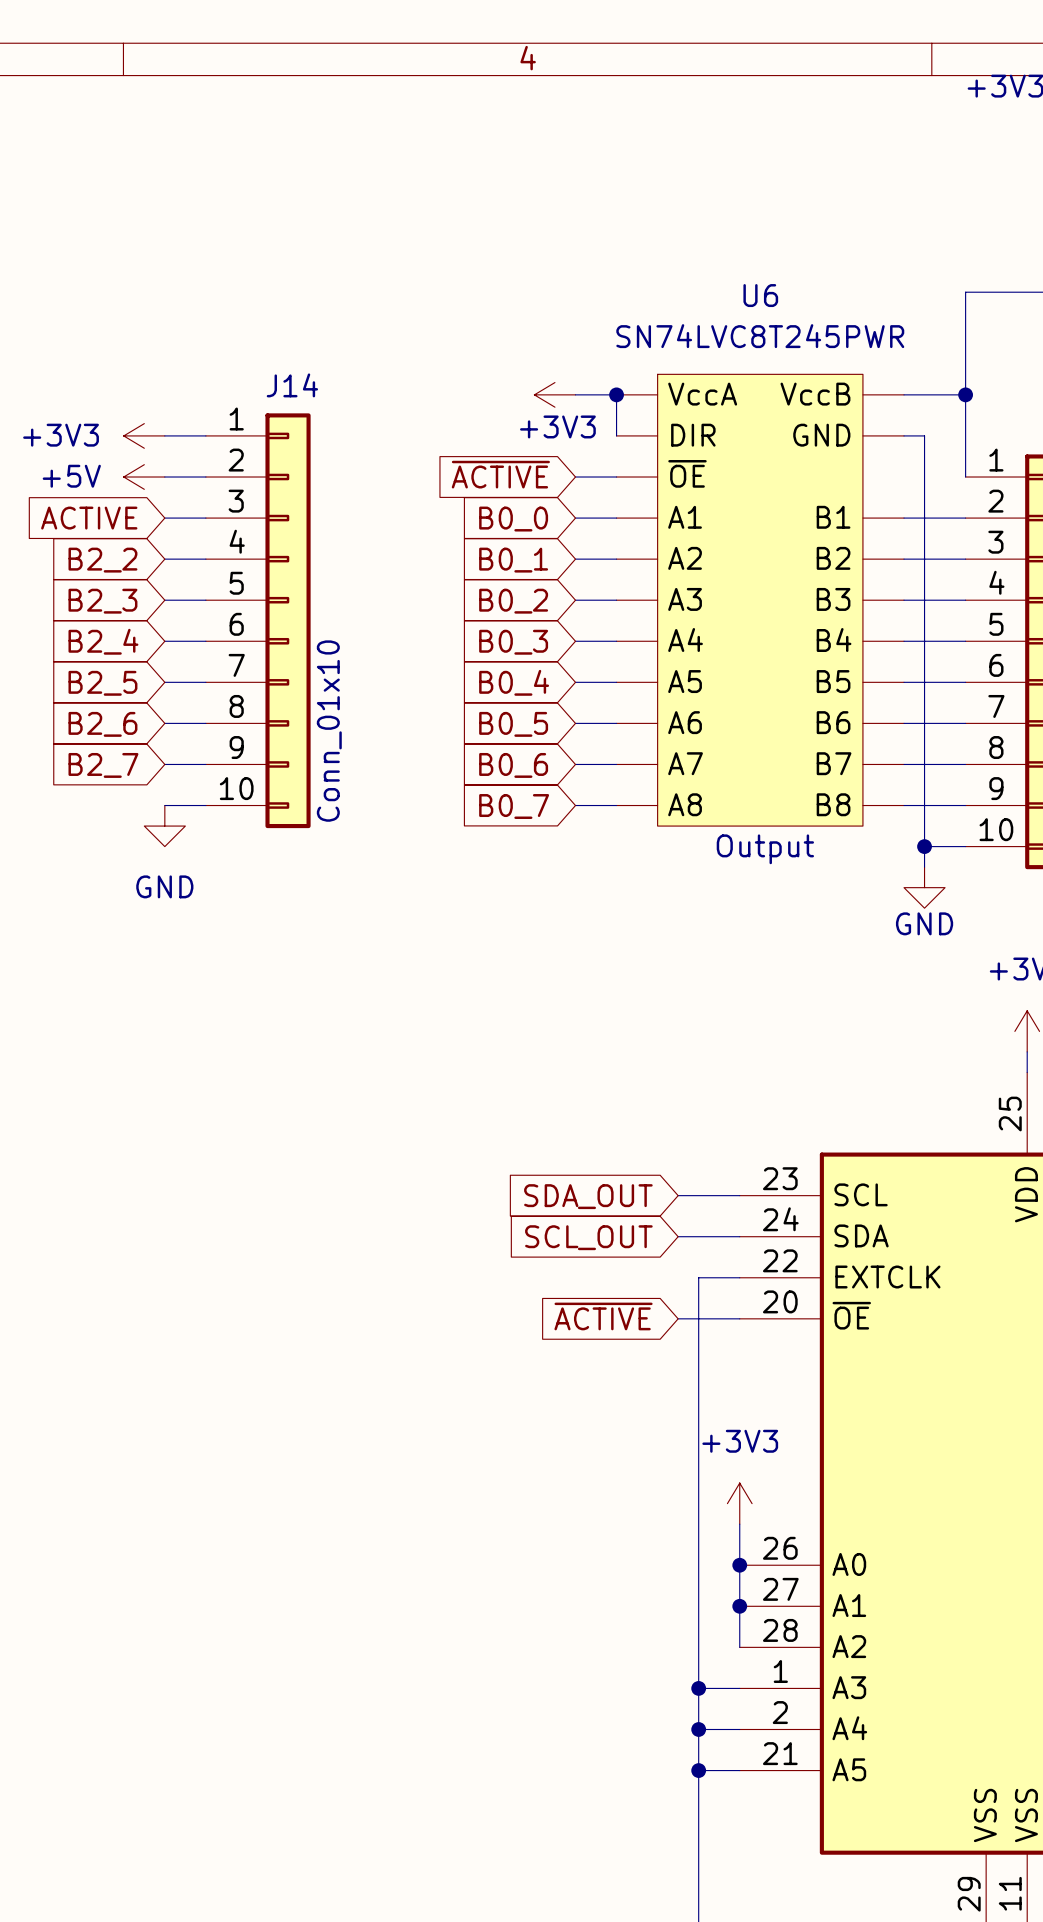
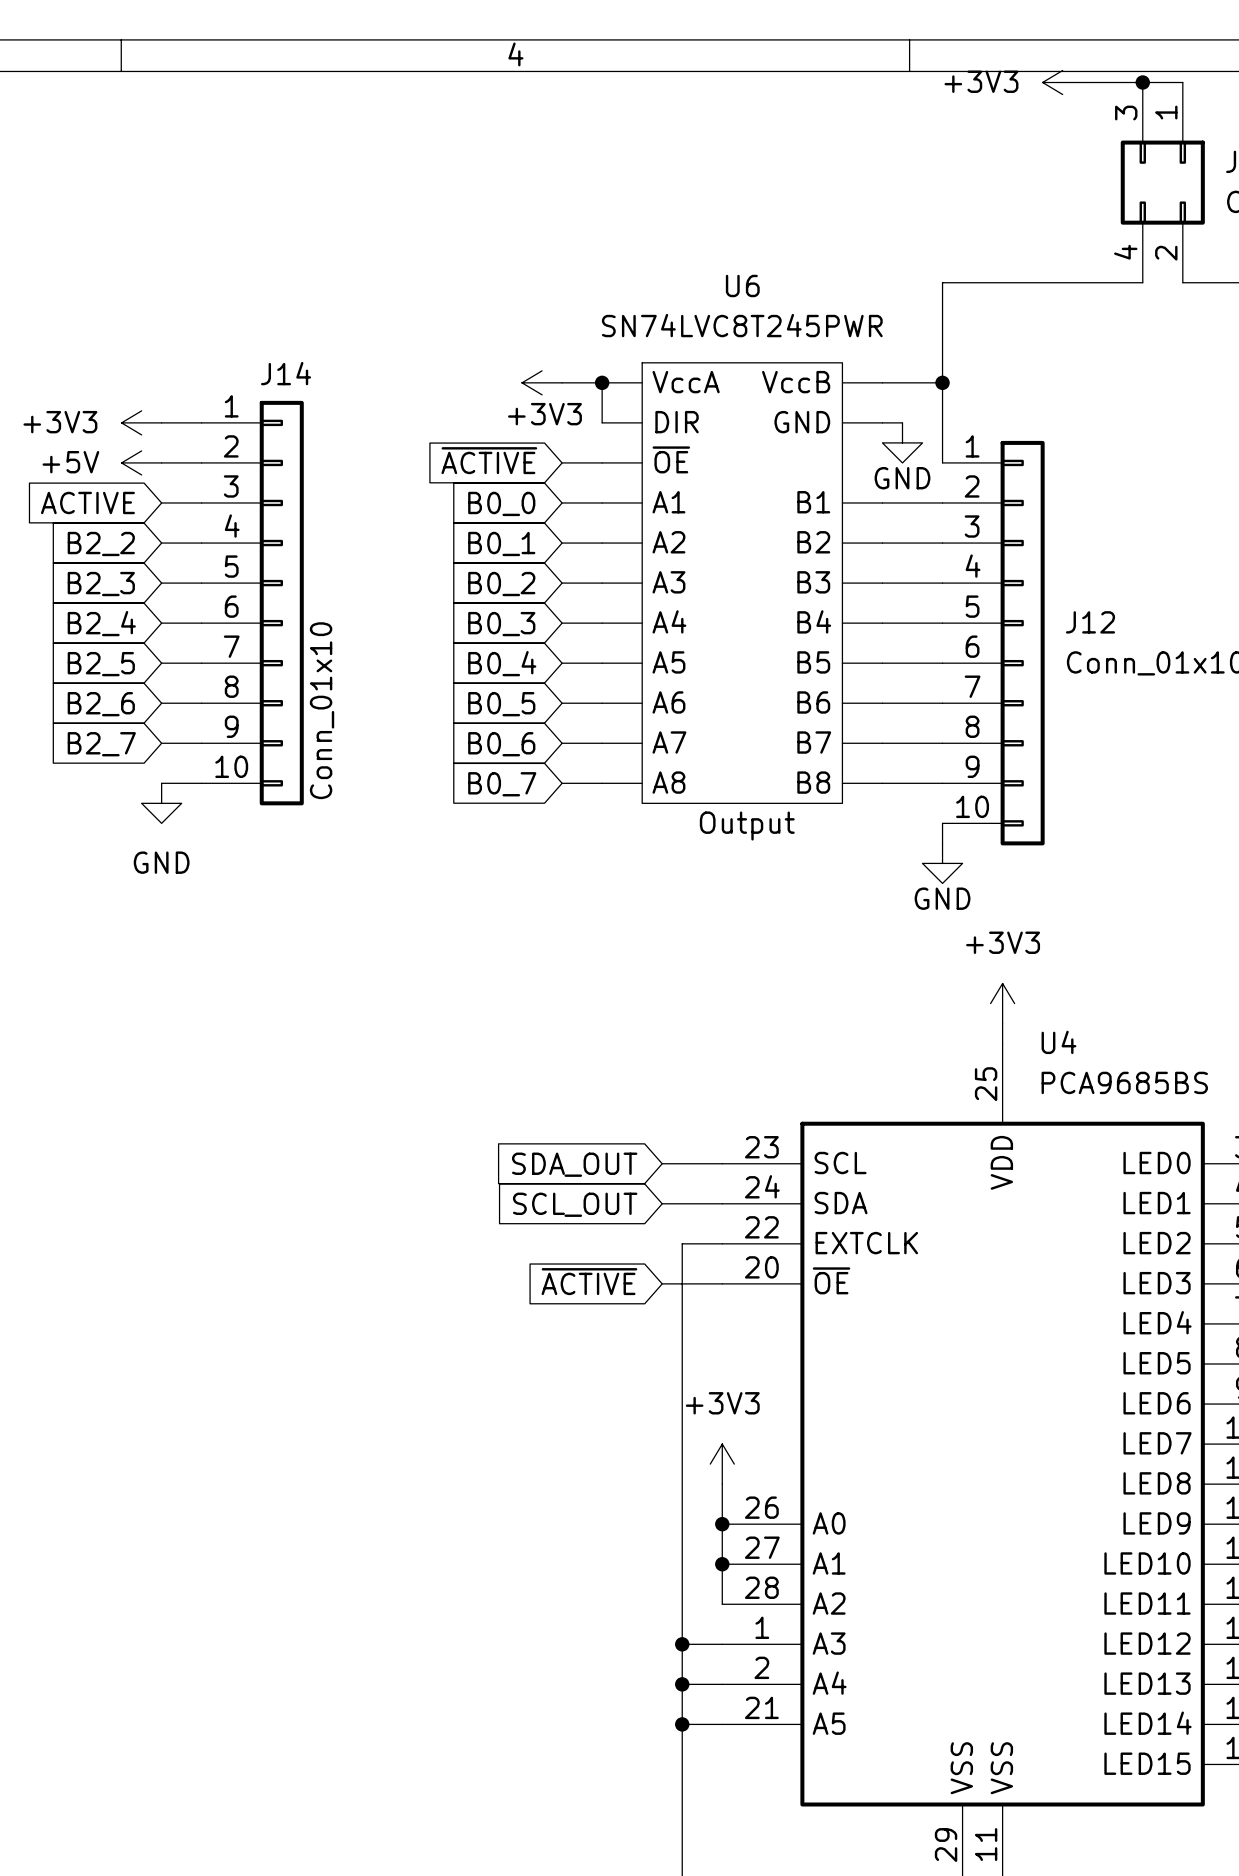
wire: (924, 435) (924, 867) -> none
power symbol: none -> GND (902, 442)
wire: (924, 846) (965, 846) -> (942, 843) (942, 823)
junction: (924, 846) -> none
power symbol position: GND (924, 887) -> GND (942, 863)

